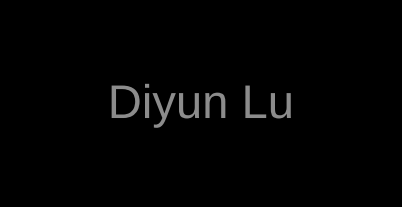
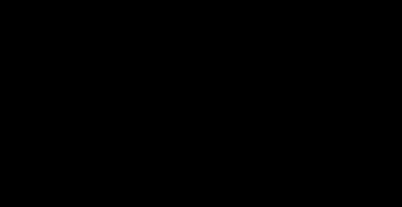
text: Diyun Lu (201, 105) -> none

